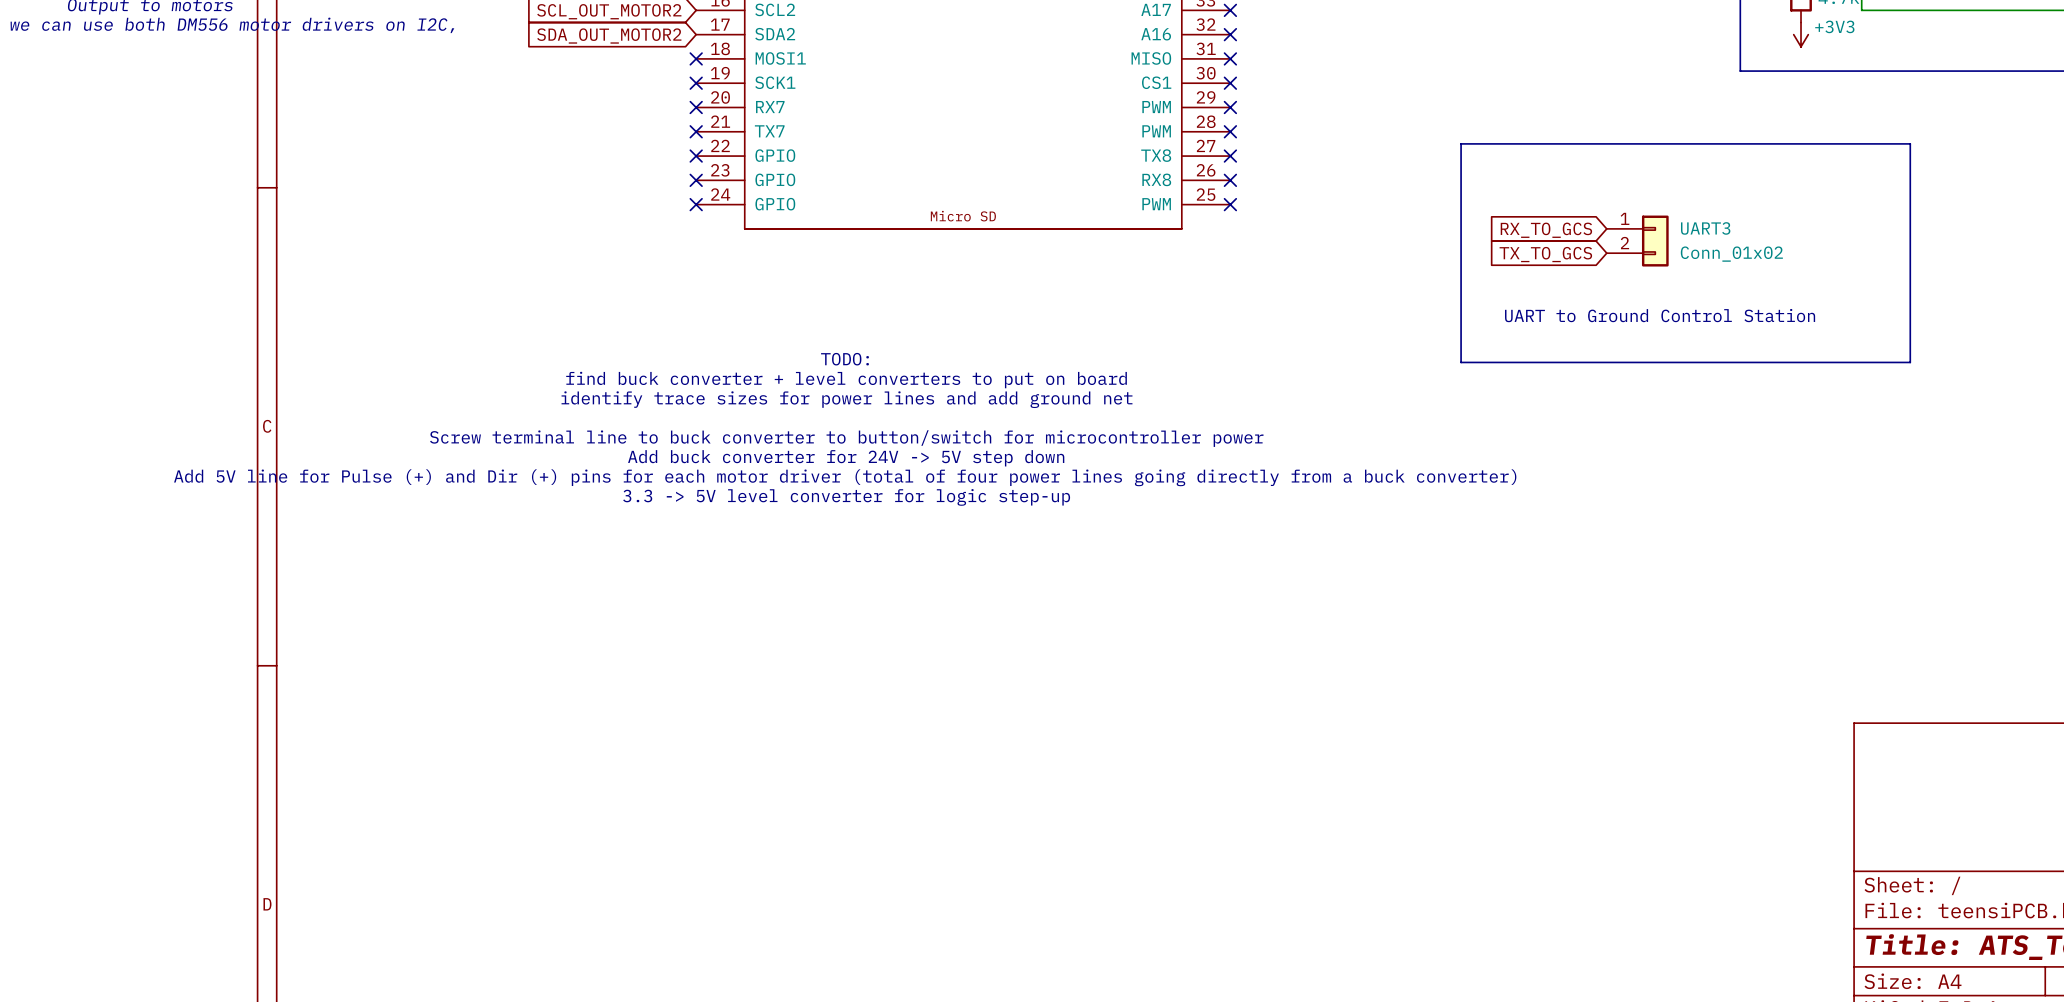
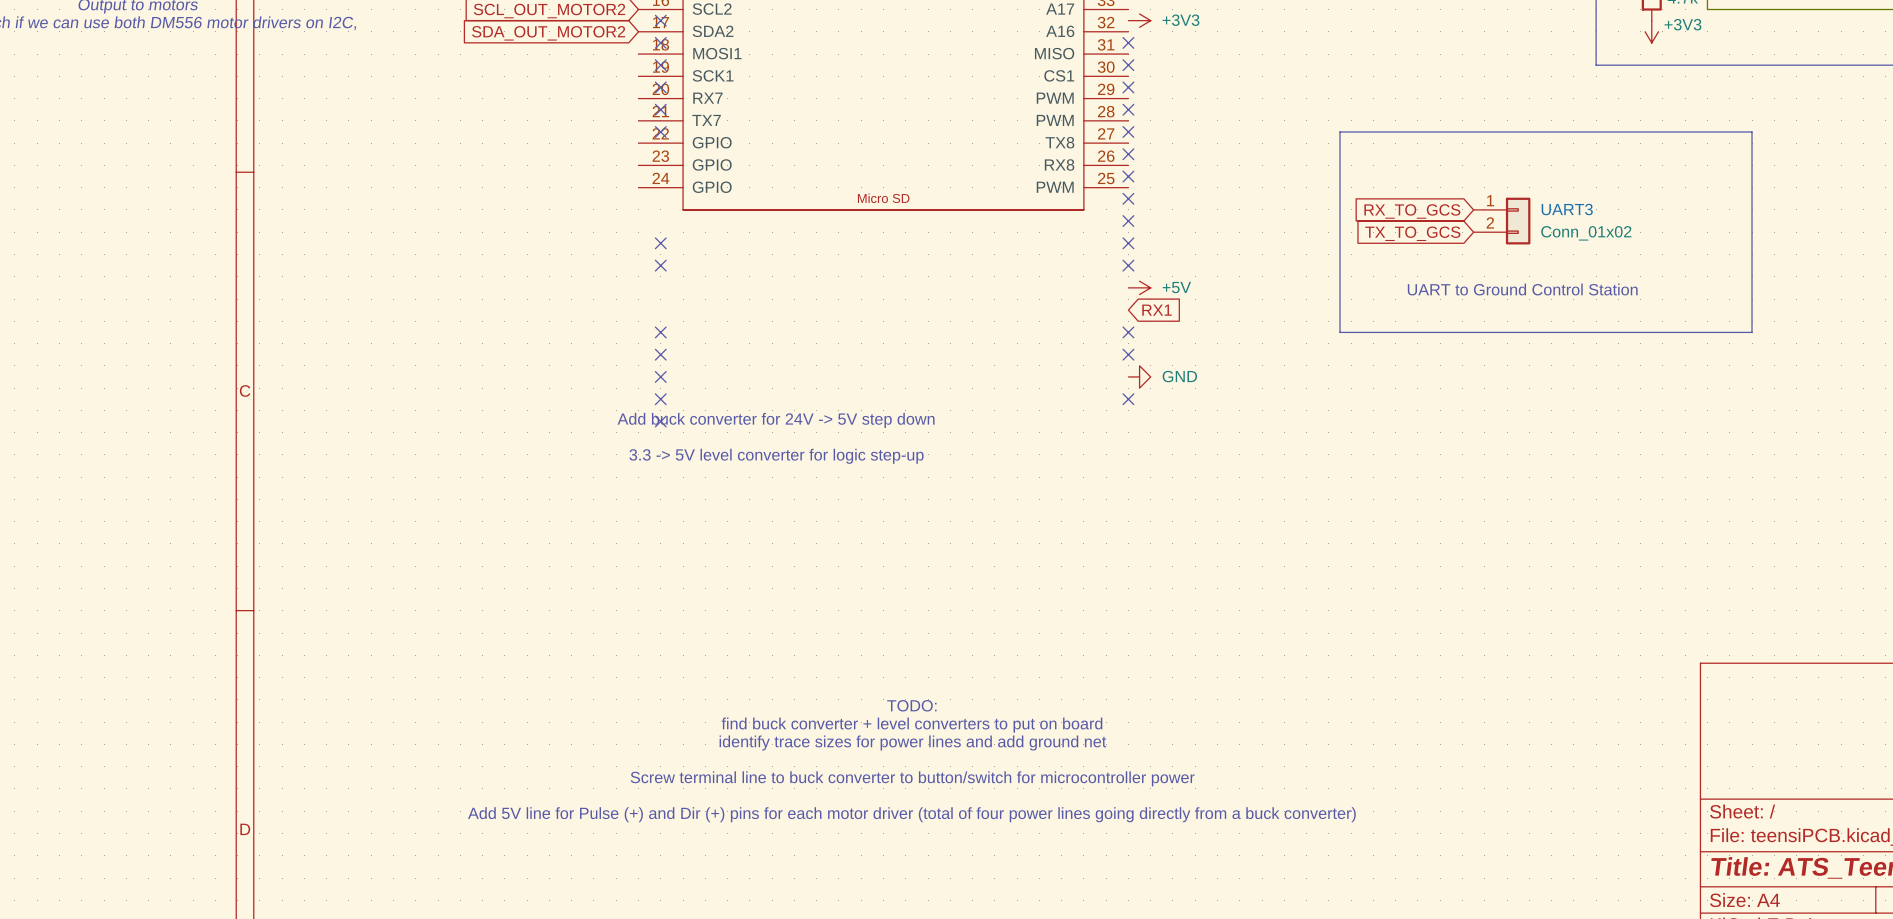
no-connect mark: (1230, 10) -> none
no-connect mark: none -> (660, 20)
power symbol: none -> +3V3 (1139, 20)
no-connect mark: (1230, 34) -> none
no-connect mark: none -> (660, 42)
no-connect mark: none -> (1128, 42)
no-connect mark: (696, 58) -> none
no-connect mark: (1230, 58) -> none
no-connect mark: none -> (660, 65)
no-connect mark: none -> (1128, 65)
no-connect mark: (696, 83) -> none
no-connect mark: (1230, 83) -> none
no-connect mark: none -> (660, 87)
no-connect mark: none -> (1128, 87)
no-connect mark: (696, 107) -> none
no-connect mark: (1230, 107) -> none
no-connect mark: none -> (660, 109)
no-connect mark: none -> (1128, 109)
no-connect mark: (696, 131) -> none
no-connect mark: (1230, 131) -> none
no-connect mark: none -> (660, 131)
no-connect mark: none -> (1128, 131)
no-connect mark: (696, 156) -> none
no-connect mark: (1230, 156) -> none
no-connect mark: none -> (1128, 154)
no-connect mark: (696, 180) -> none
no-connect mark: (1230, 180) -> none
no-connect mark: none -> (1128, 176)
no-connect mark: (696, 204) -> none
no-connect mark: (1230, 204) -> none
no-connect mark: none -> (1128, 198)
no-connect mark: none -> (1128, 221)
no-connect mark: none -> (660, 243)
no-connect mark: none -> (1128, 243)
no-connect mark: none -> (660, 265)
no-connect mark: none -> (1128, 265)
power symbol: none -> +5V (1139, 287)
global label: none -> RX1 (1156, 310)
text: TODO: (844, 359) -> none
no-connect mark: none -> (660, 332)
no-connect mark: none -> (1128, 332)
text: find buck converter + level converters to put on board (846, 380) -> none
no-connect mark: none -> (660, 354)
no-connect mark: none -> (1128, 354)
text: identify trace sizes for power lines and add ground net (847, 399) -> none
no-connect mark: none -> (660, 376)
power symbol: none -> GND (1139, 376)
no-connect mark: none -> (660, 399)
no-connect mark: none -> (1128, 399)
text: Screw terminal line to buck converter to button/switch for microcontroller power (846, 438) -> none
no-connect mark: none -> (660, 421)
text: Add 5V line for Pulse (+) and Dir (+) pins for each motor driver (total of four power lines going directly from a buck converter) (845, 477) -> none
text: none -> TODO: (911, 705)
text: none -> find buck converter + level converters to put on board (912, 725)
text: none -> identify trace sizes for power lines and add ground net (912, 743)
text: none -> Screw terminal line to buck converter to button/switch for microcontroller power (912, 778)
text: none -> Add 5V line for Pulse (+) and Dir (+) pins for each motor driver (total of four power lines going directly from a buck converter) (911, 814)

